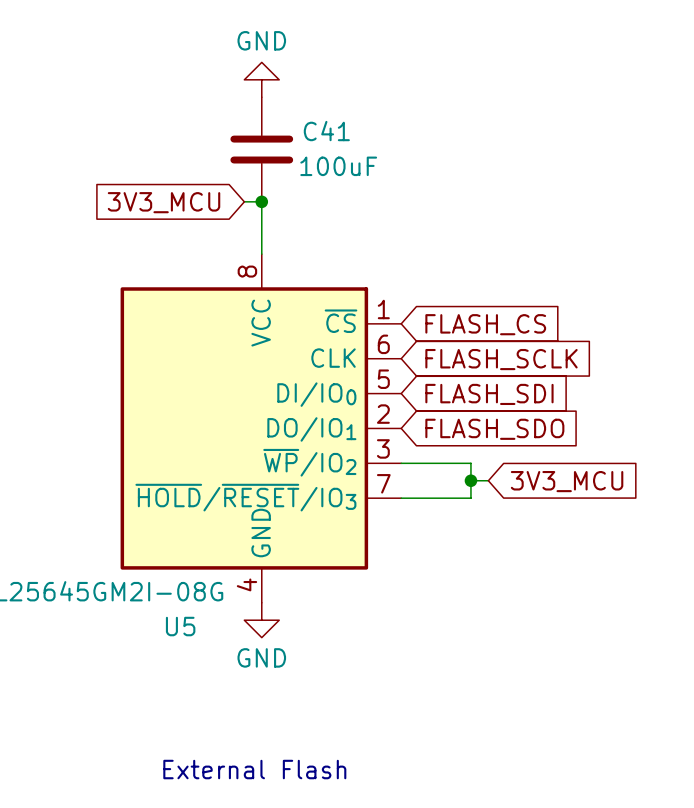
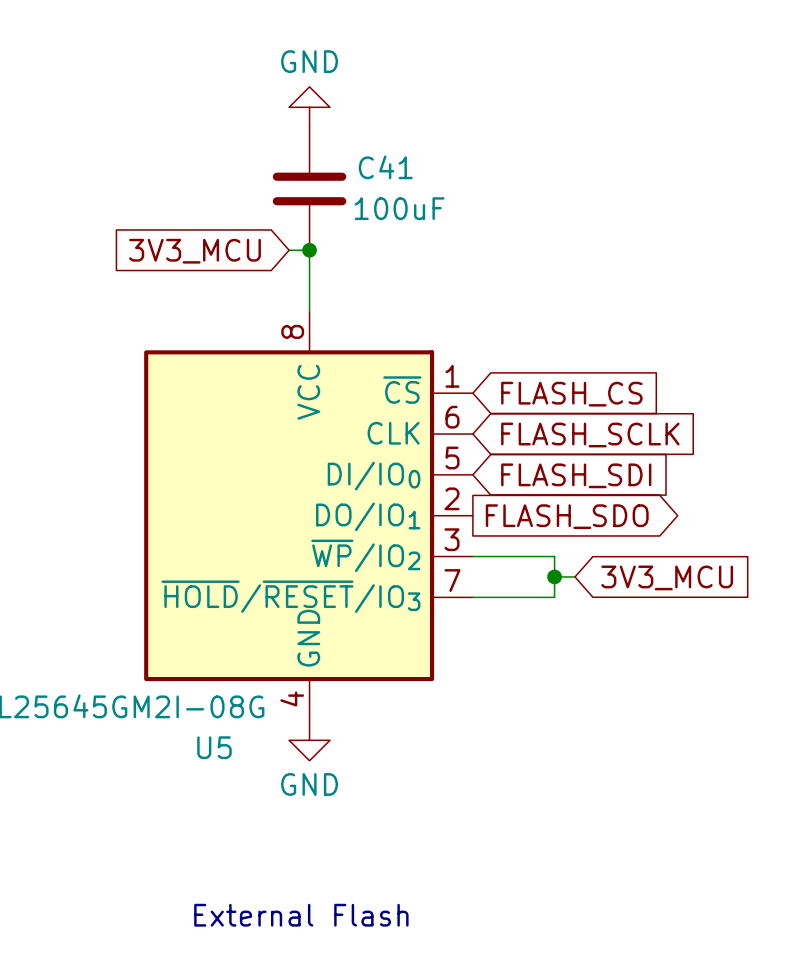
global label shape: input (494, 429) -> output (567, 516)

